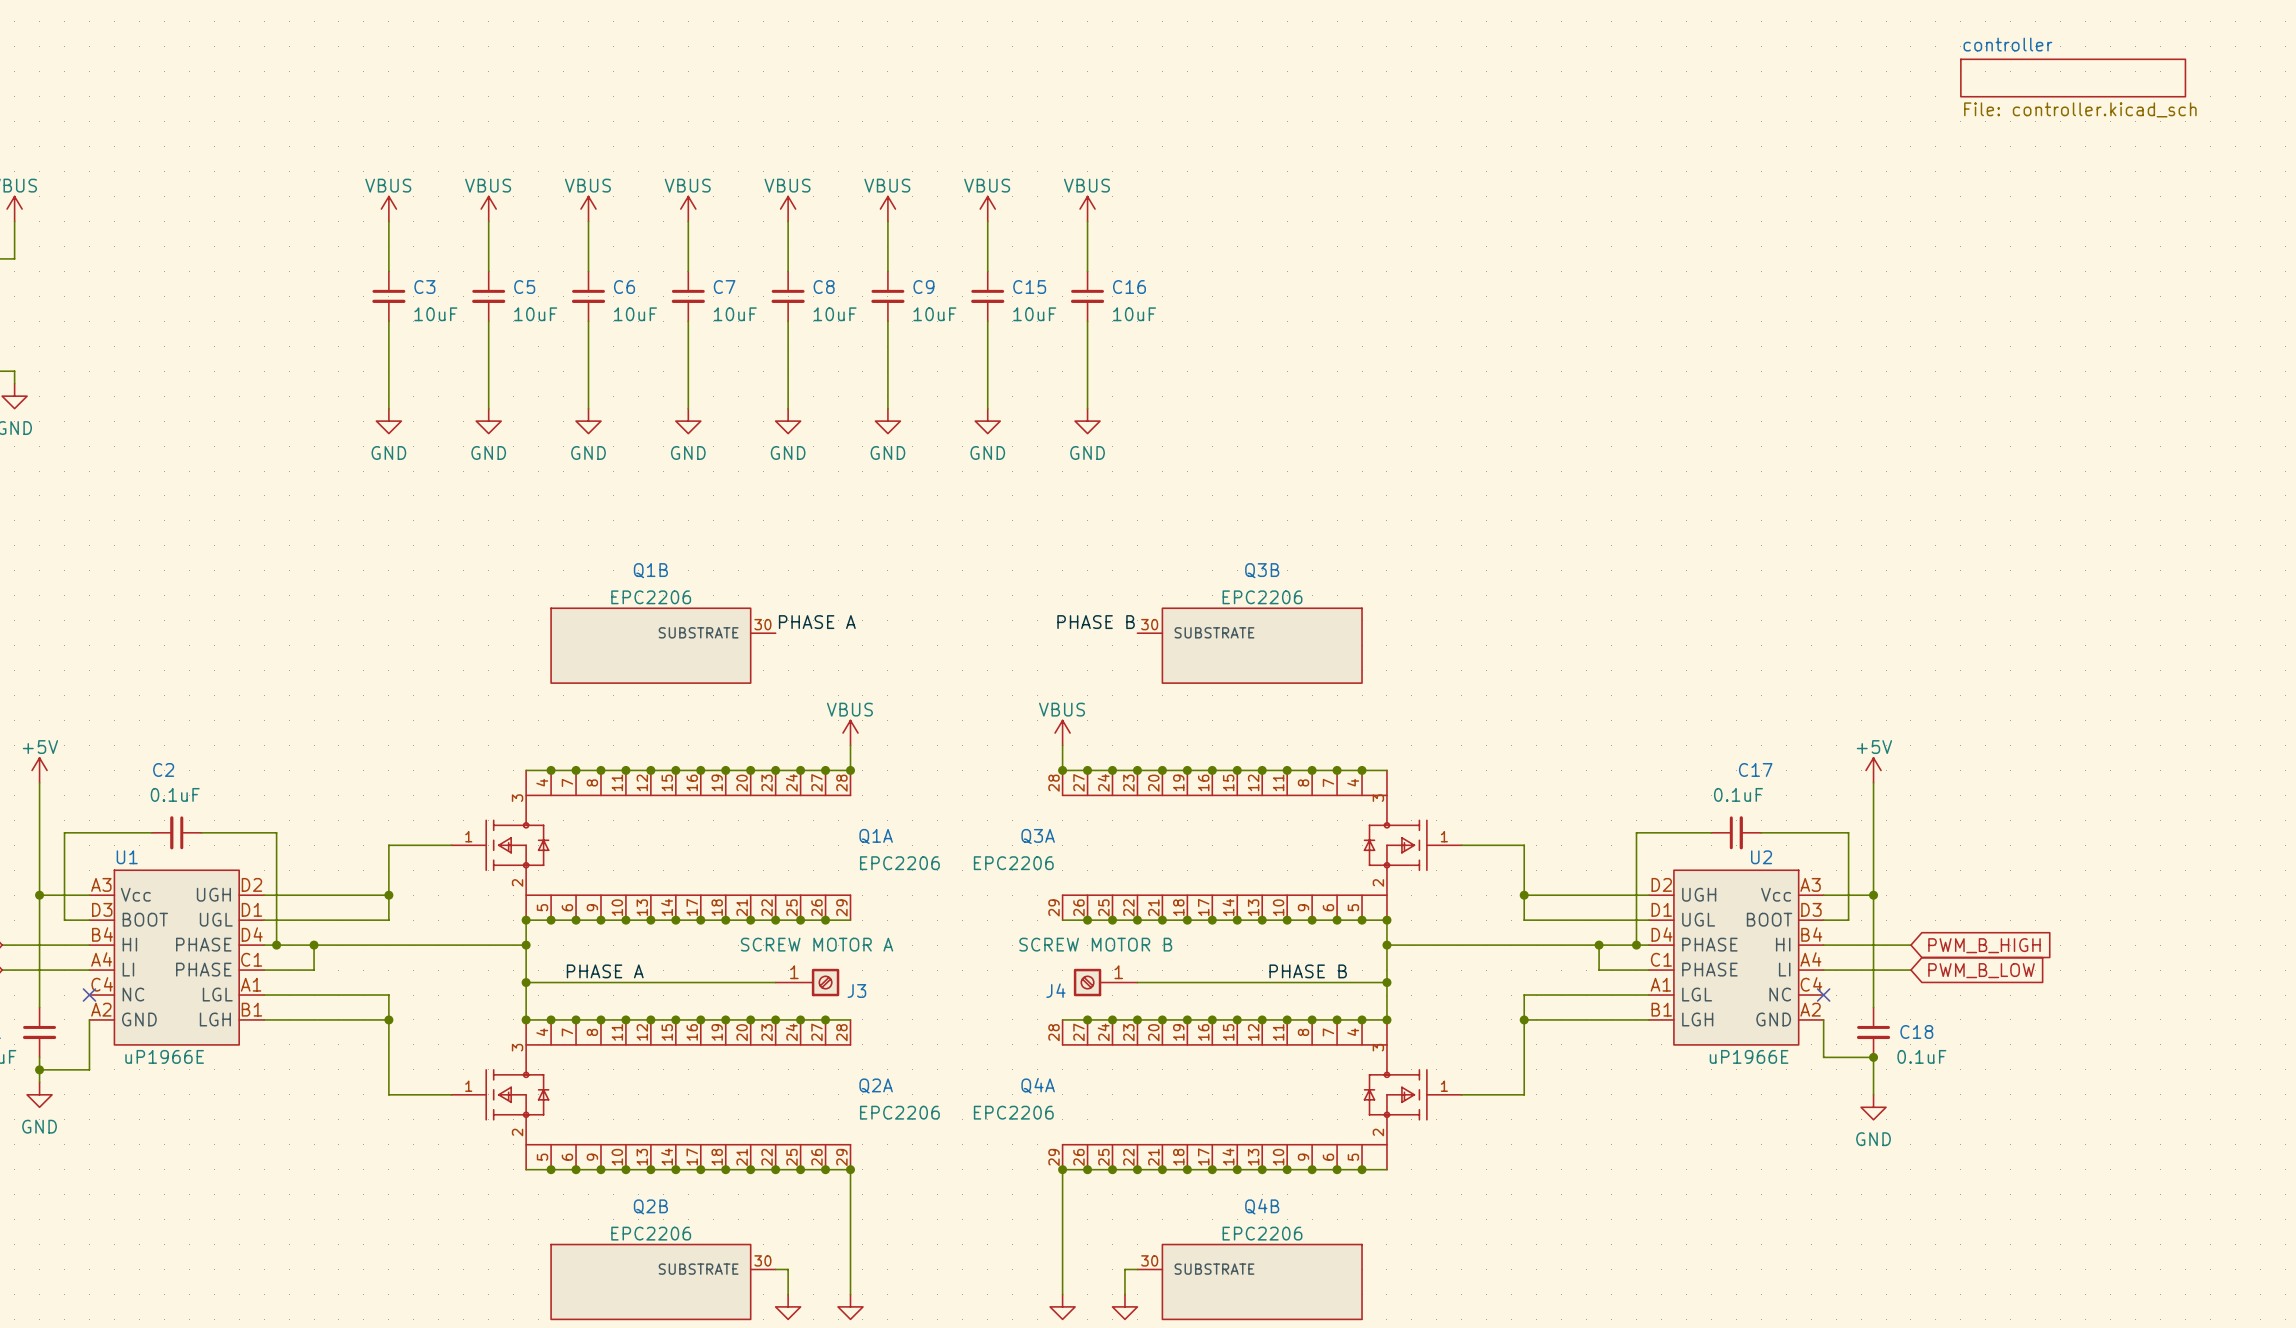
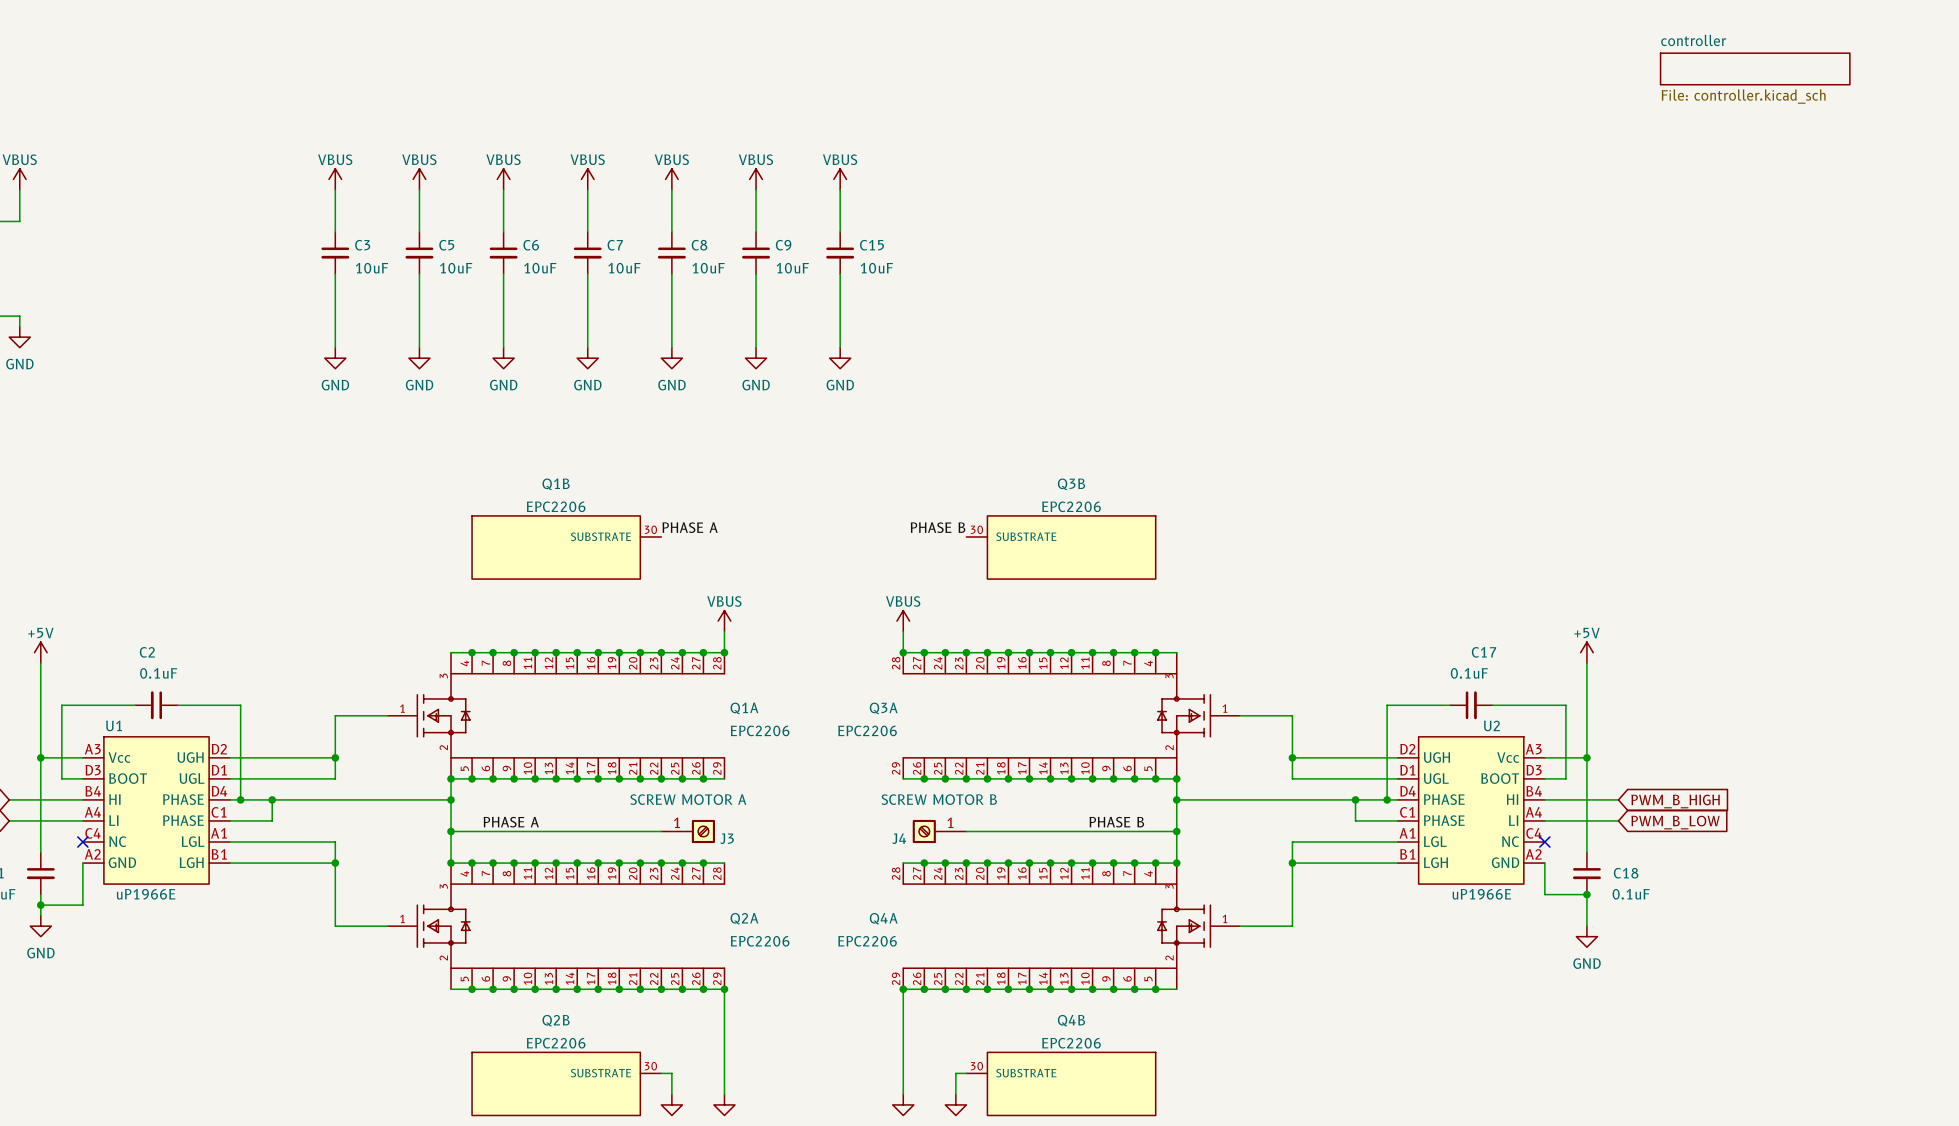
power symbol: VBUS (1087, 209) -> none
wire: (1087, 221) (1087, 271) -> none
C16: 10uF (1087, 296) -> none
wire: (1087, 321) (1087, 408) -> none
power symbol: GND (1087, 421) -> none

